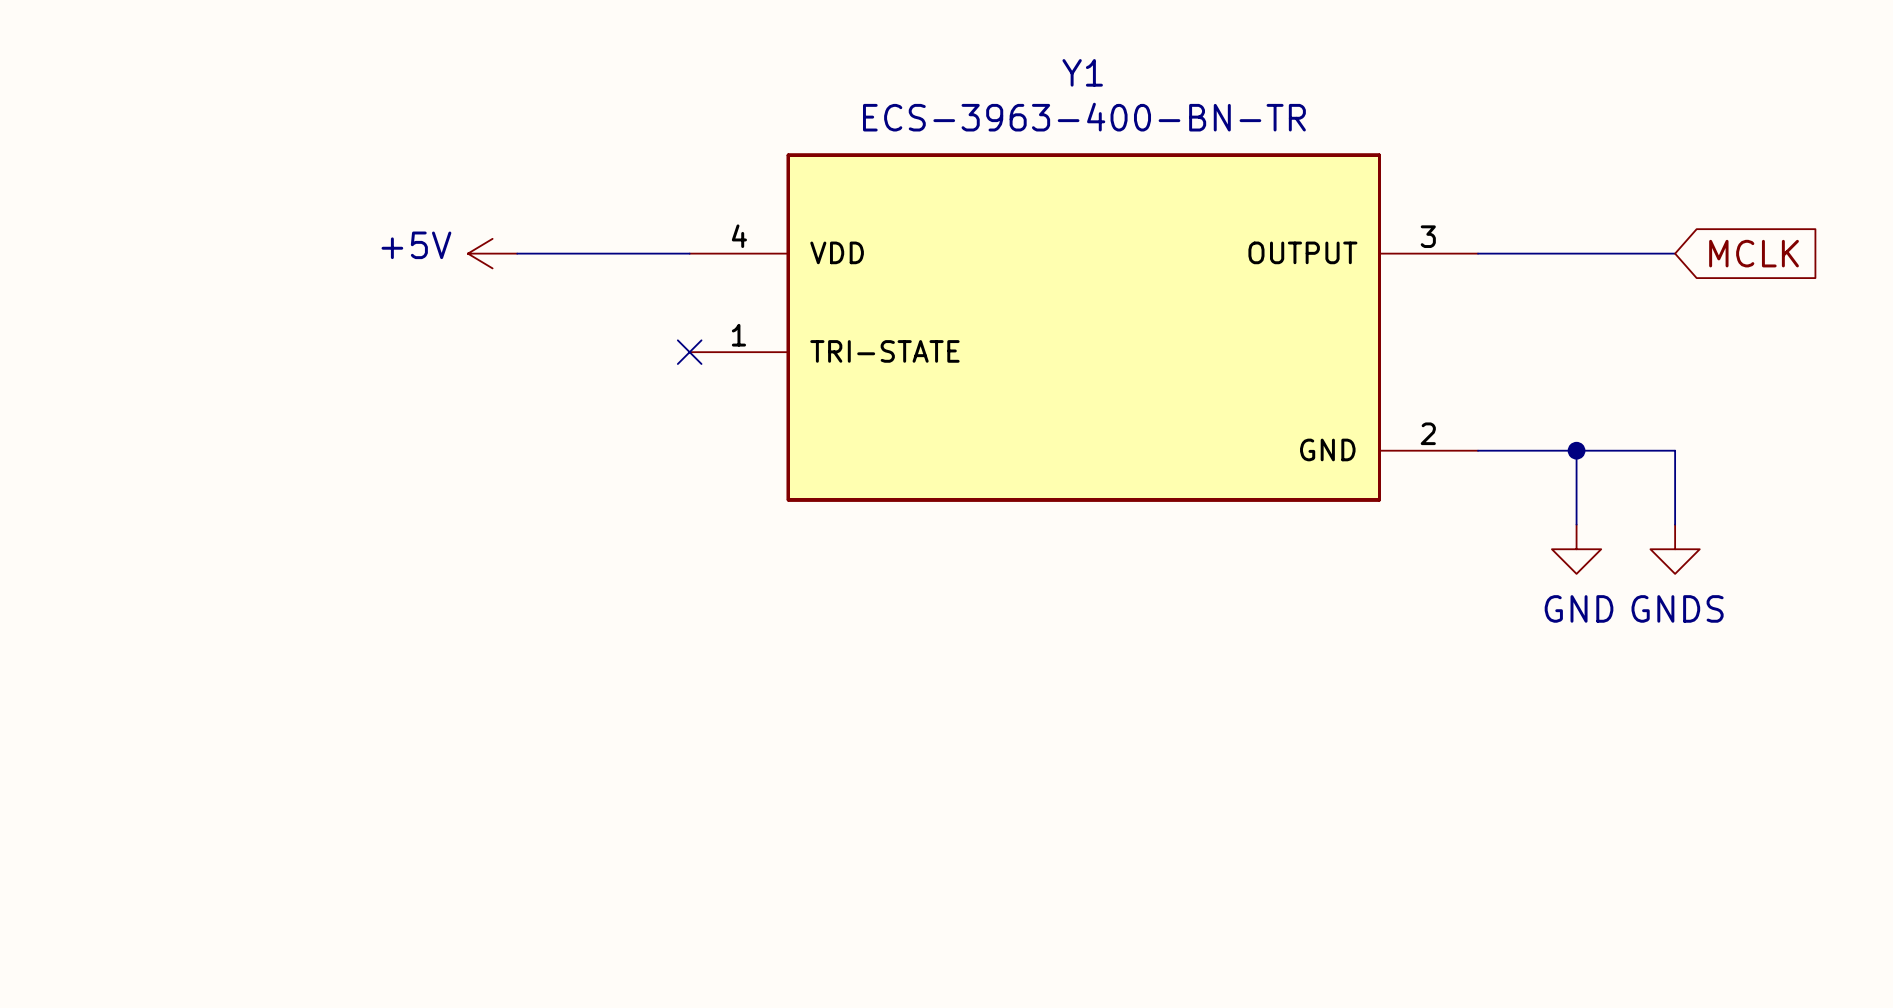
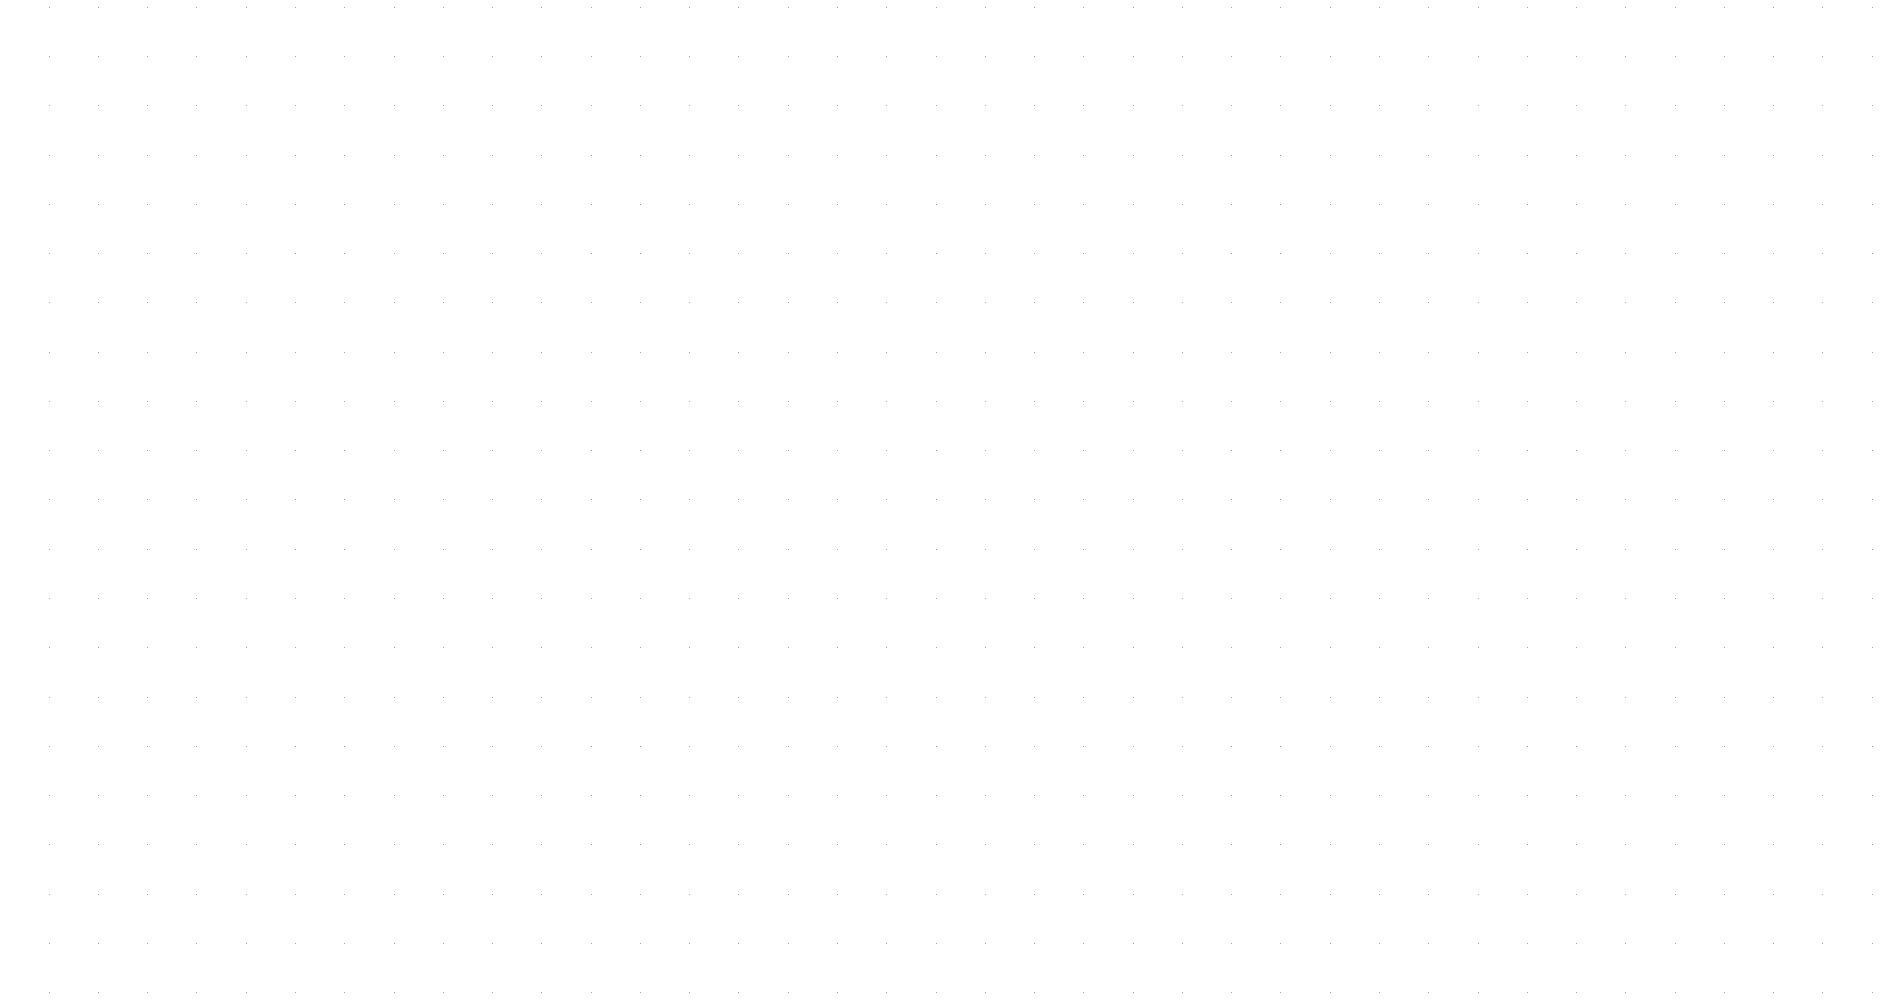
power symbol: +5V (492, 253) -> none
wire: (517, 253) (689, 253) -> none
wire: (1478, 253) (1675, 253) -> none
global label: MCLK (1754, 253) -> none
Y1: ECS-3963-400-BN-TR (1083, 327) -> none
no-connect mark: (689, 352) -> none
wire: (1478, 450) (1675, 450) (1675, 524) -> none
wire: (1576, 450) (1576, 524) -> none
junction: (1576, 450) -> none
power symbol: GND (1576, 549) -> none
power symbol: GNDS (1675, 549) -> none

